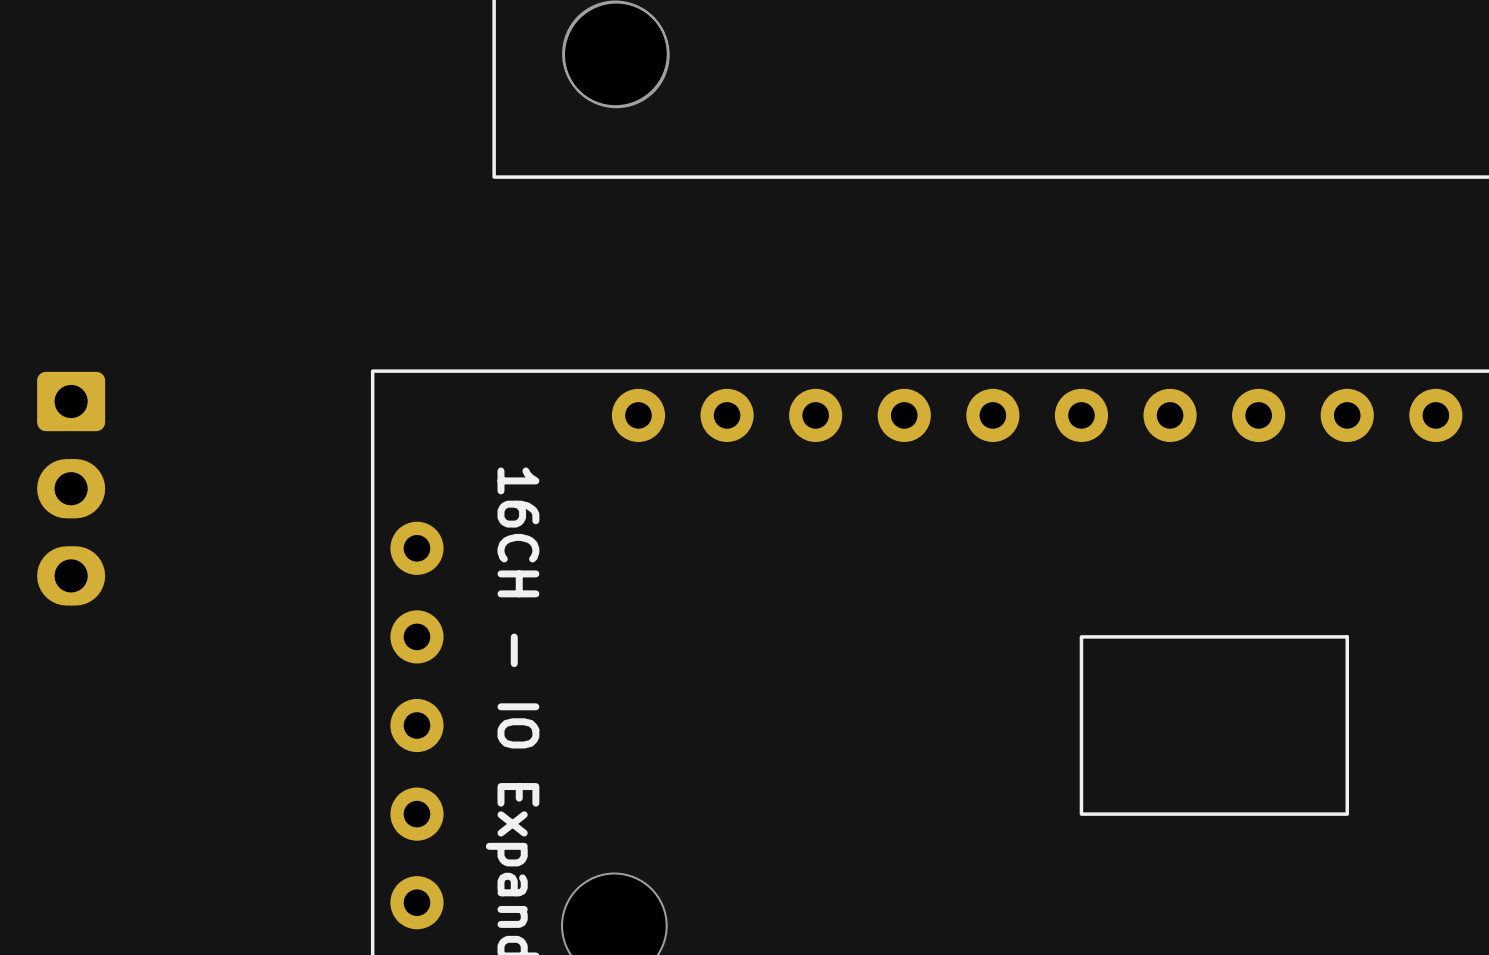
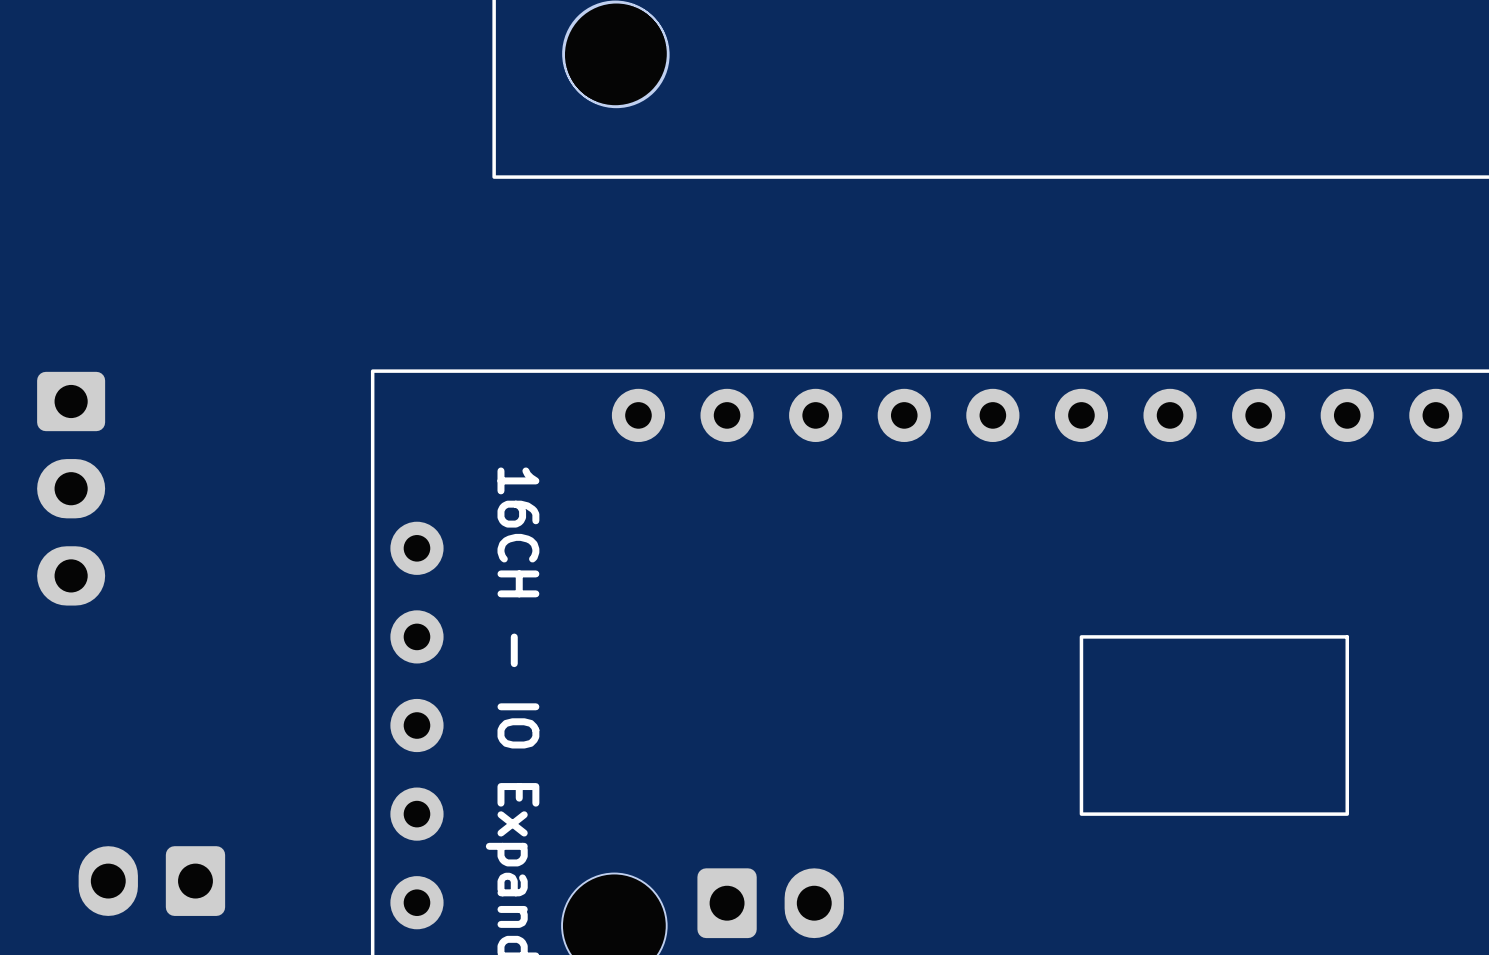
part: none -> (151, 881)
part: none -> (770, 903)

